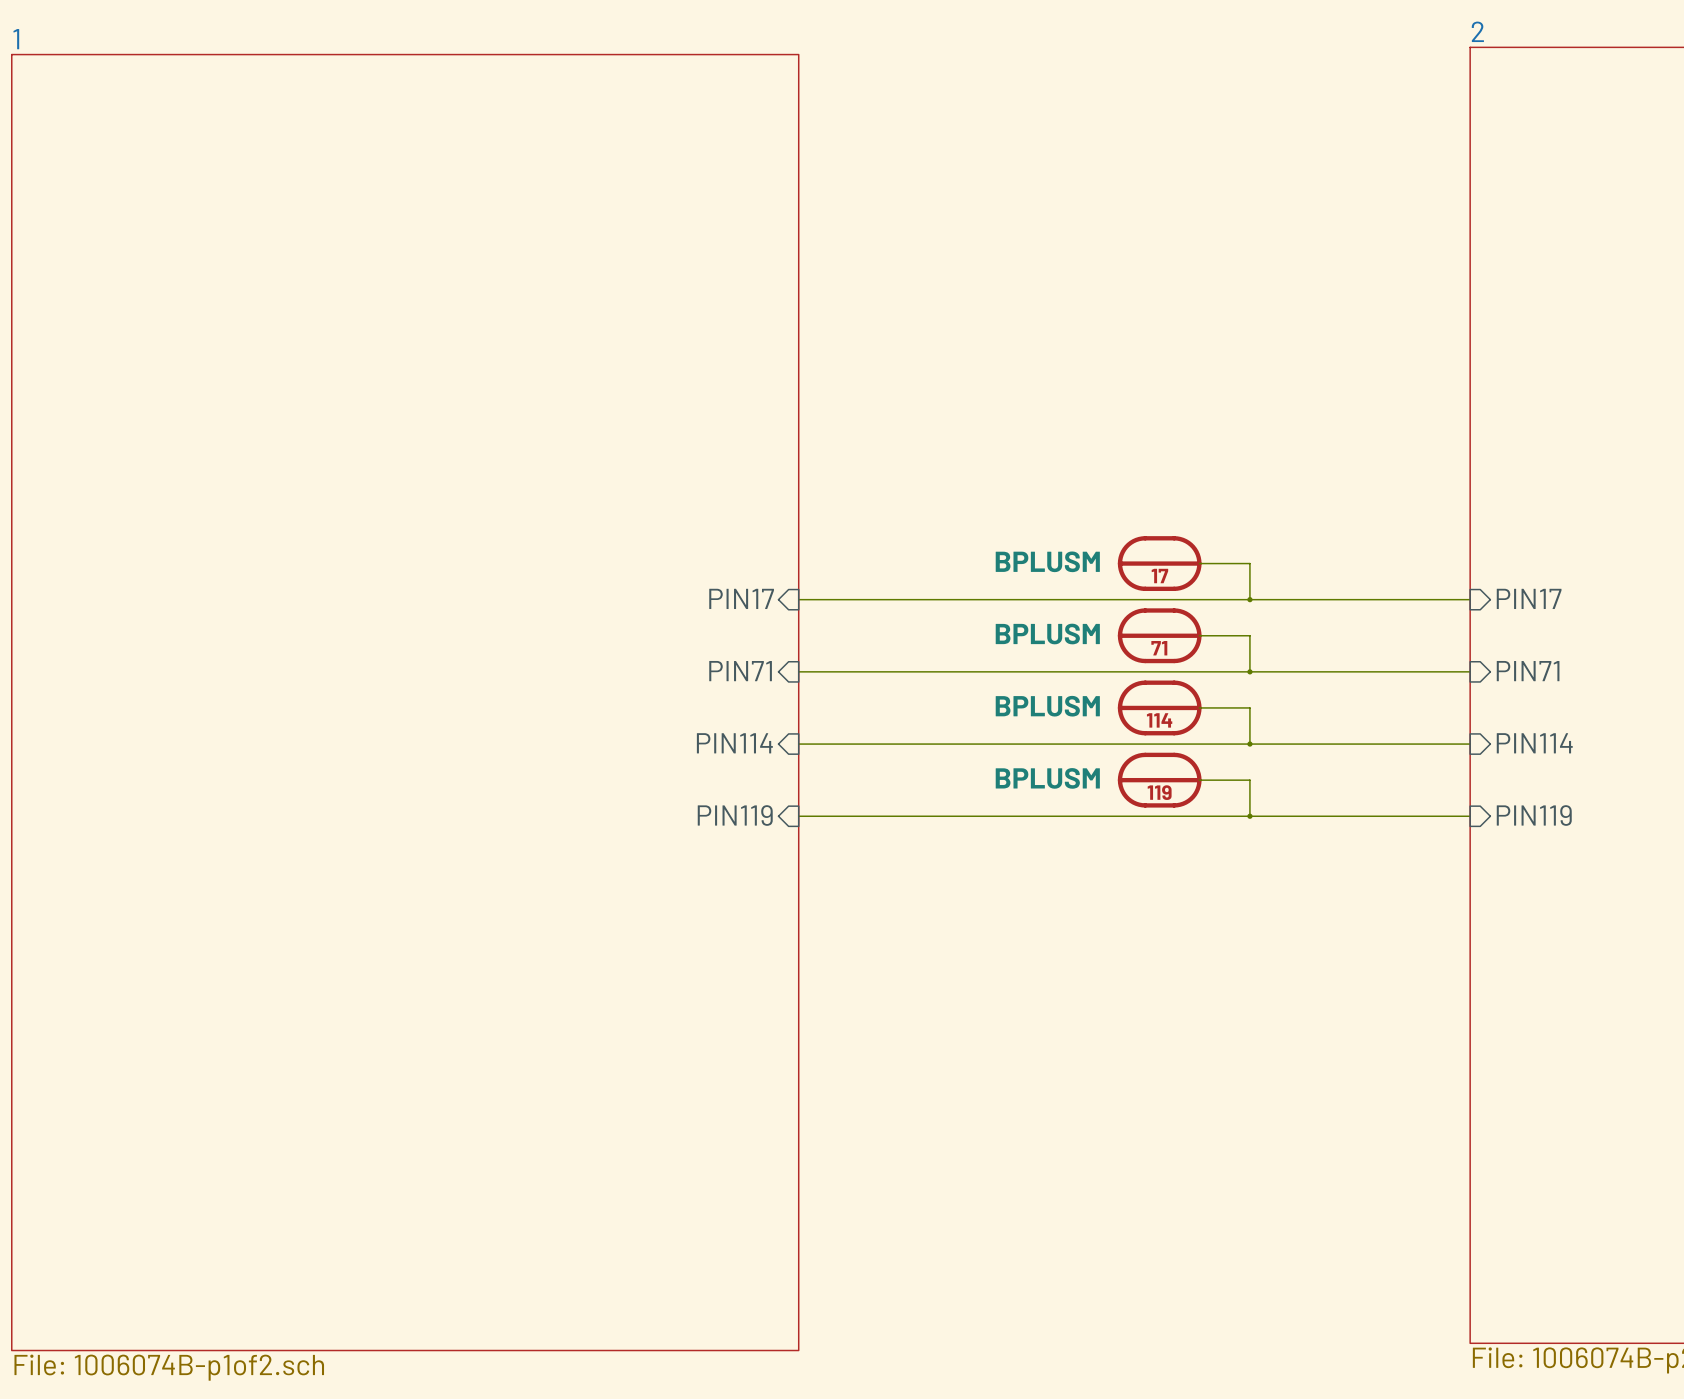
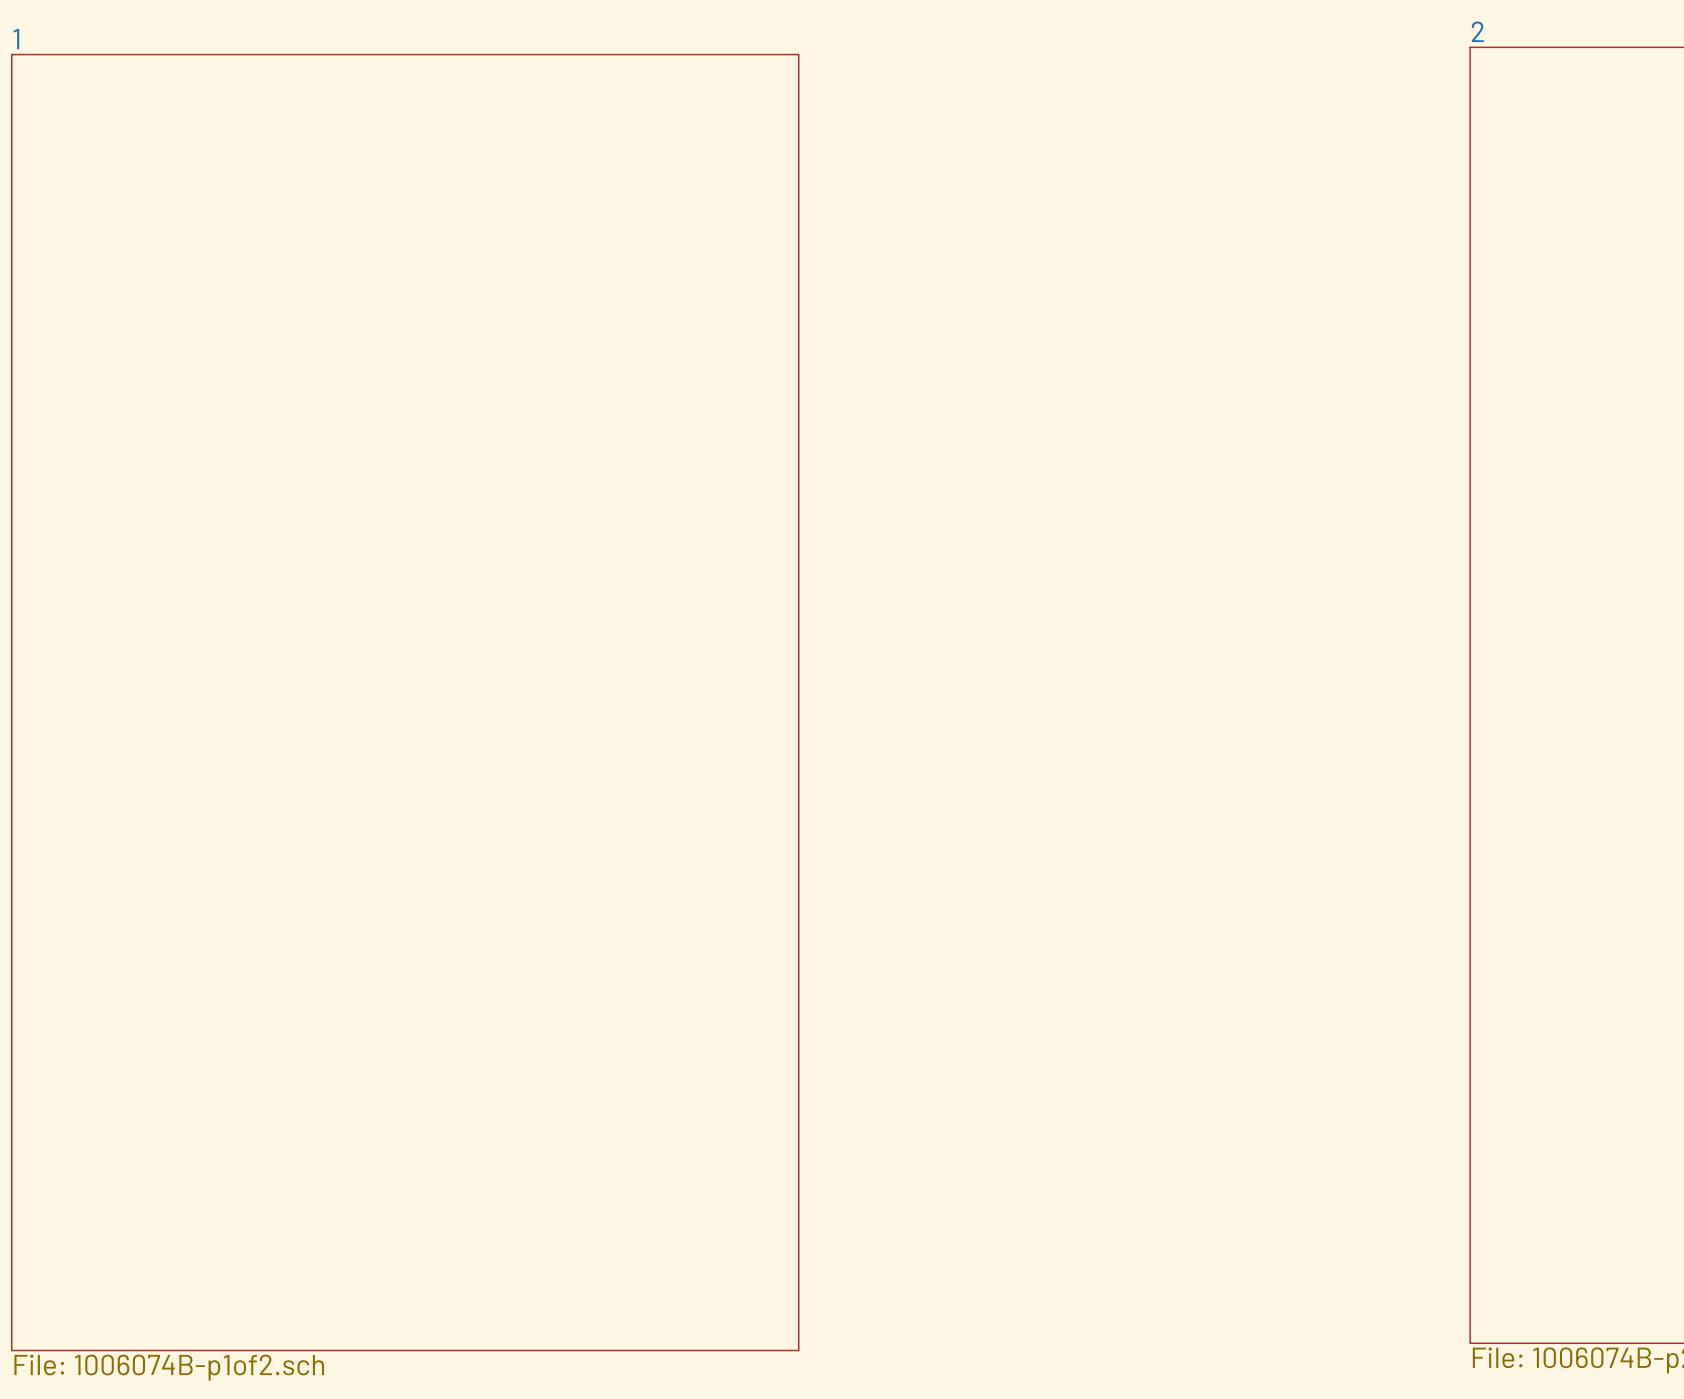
part: (1159, 563) -> none
wire: (1199, 563) (1249, 563) (1249, 599) -> none
sheet pin: PIN17 (741, 598) -> none
sheet pin: PIN17 (1529, 598) -> none
wire: (798, 599) (1470, 599) -> none
junction: (1249, 599) -> none
part: (1159, 635) -> none
wire: (1199, 635) (1249, 635) (1249, 671) -> none
sheet pin: PIN71 (740, 671) -> none
wire: (798, 671) (1470, 671) -> none
junction: (1249, 671) -> none
sheet pin: PIN71 (1528, 671) -> none
part: (1159, 707) -> none
wire: (1199, 707) (1249, 707) (1249, 744) -> none
sheet pin: PIN114 (734, 743) -> none
sheet pin: PIN114 (1534, 743) -> none
wire: (798, 744) (1470, 744) -> none
junction: (1249, 744) -> none
part: (1159, 780) -> none
wire: (1199, 780) (1249, 780) (1249, 816) -> none
sheet pin: PIN119 (735, 815) -> none
sheet pin: PIN119 (1534, 815) -> none
wire: (798, 816) (1470, 816) -> none
junction: (1249, 816) -> none

